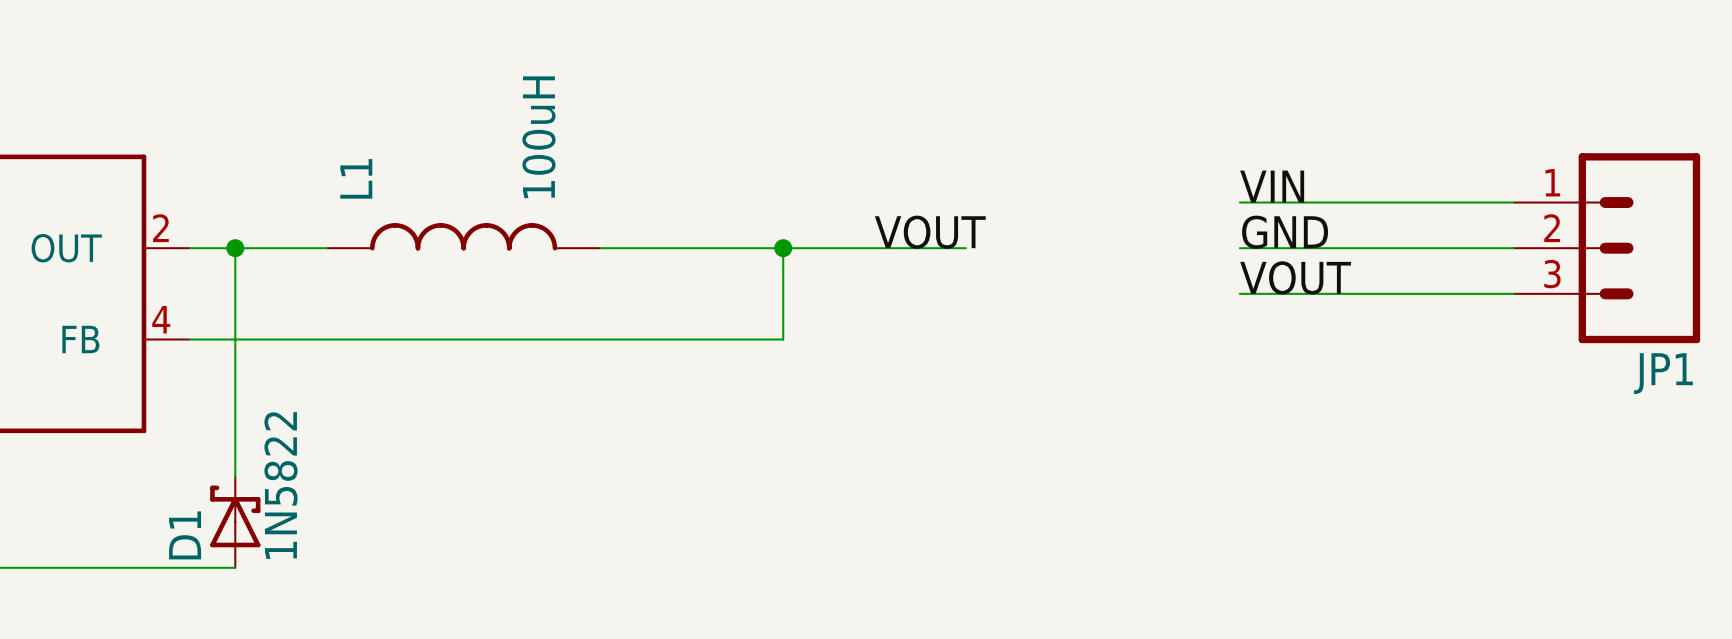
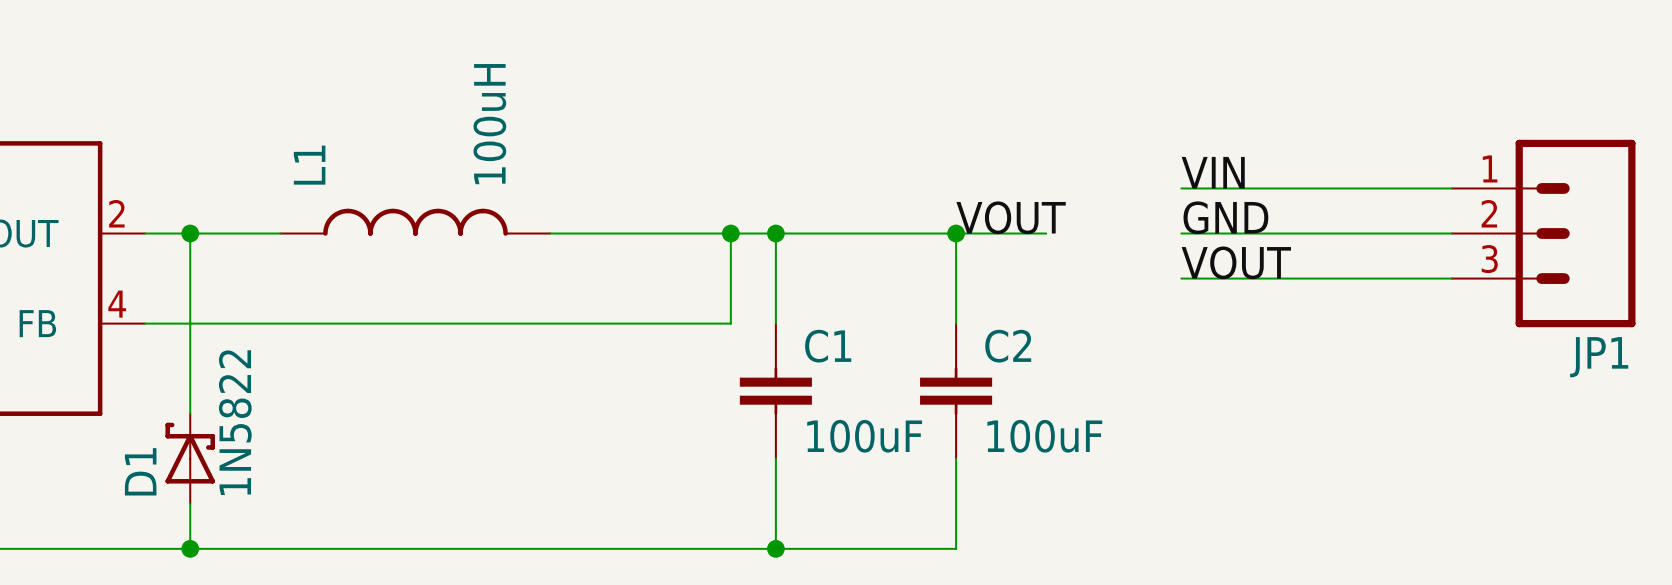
label position: VOUT (930, 232) -> VOUT (1011, 217)
wire: none -> (775, 233) (775, 323)
junction: none -> (775, 233)
wire: none -> (911, 233) (1046, 233)
wire: none -> (956, 233) (956, 323)
junction: none -> (956, 233)
C1: none -> 100uF (775, 391)
C2: none -> 100uF (956, 391)
wire: none -> (775, 458) (775, 548)
wire: none -> (956, 458) (956, 548) (190, 548) (190, 503)
D1 position: (235, 522) -> (190, 458)
junction: none -> (190, 548)
junction: none -> (775, 548)

